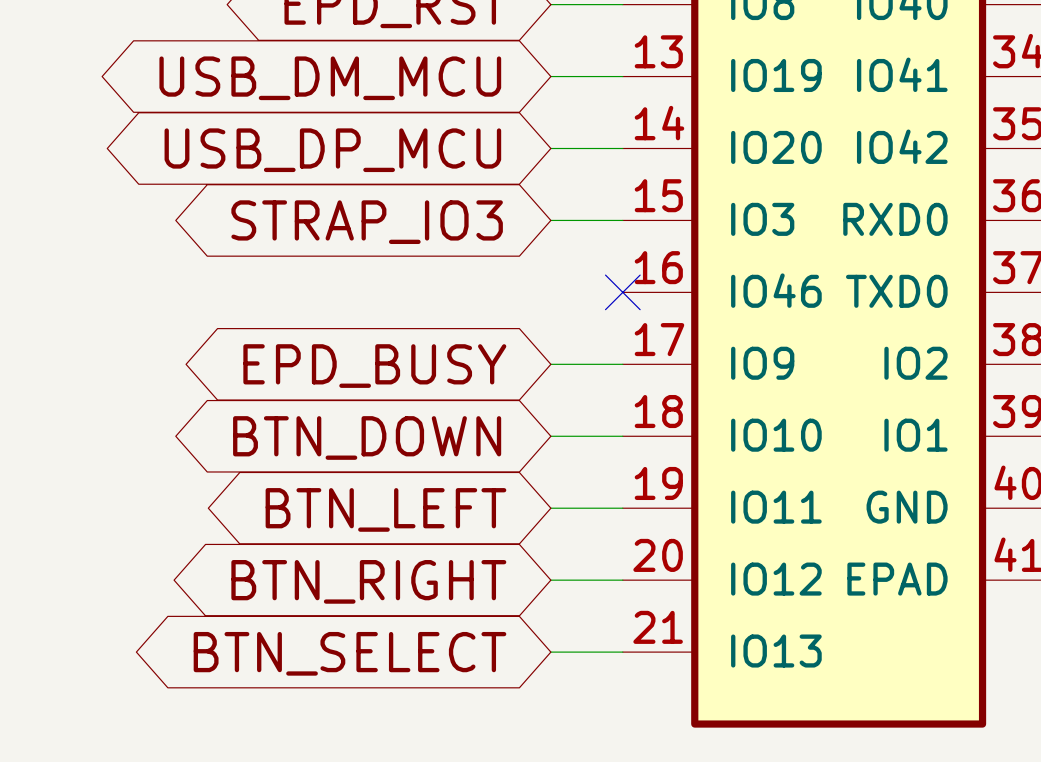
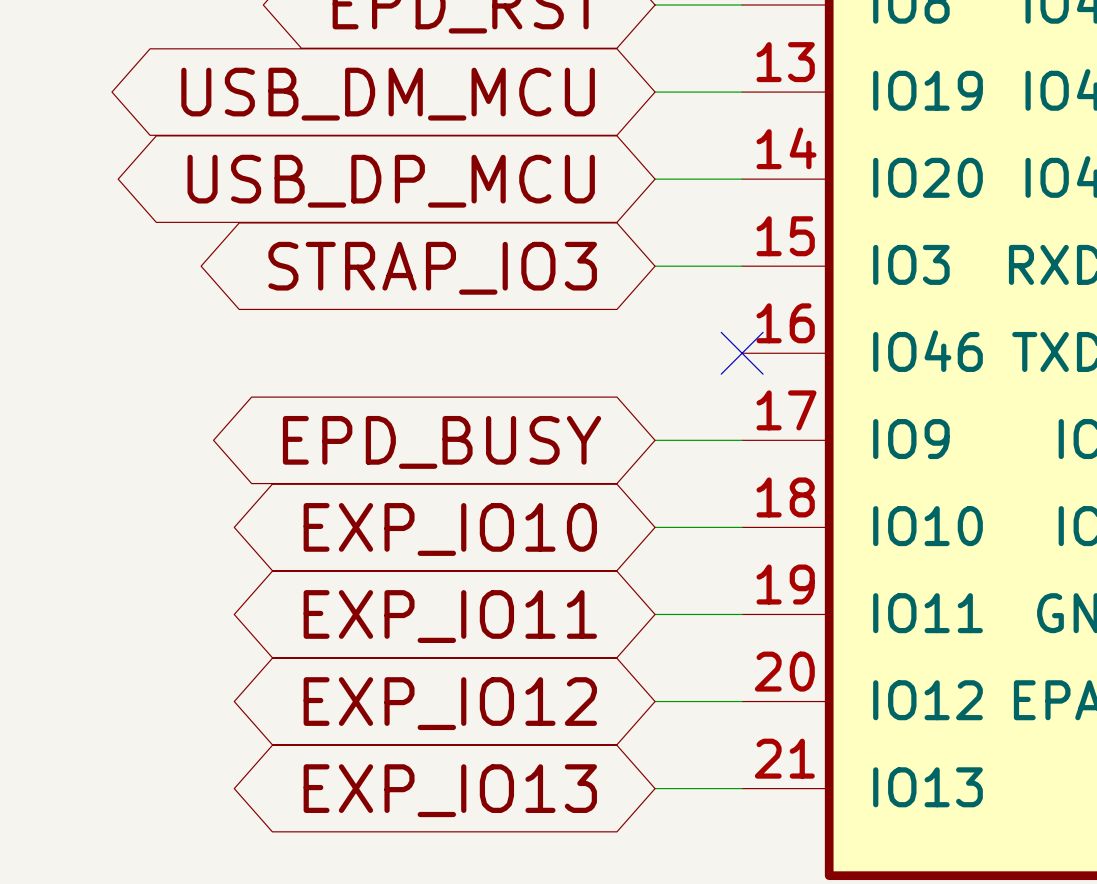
global label: BTN_DOWN (367, 437) -> EXP_IO10 (450, 529)
global label: BTN_LEFT (385, 509) -> EXP_IO11 (450, 616)
global label: BTN_RIGHT (368, 581) -> EXP_IO12 (450, 703)
global label: BTN_SELECT (349, 653) -> EXP_IO13 (450, 790)

